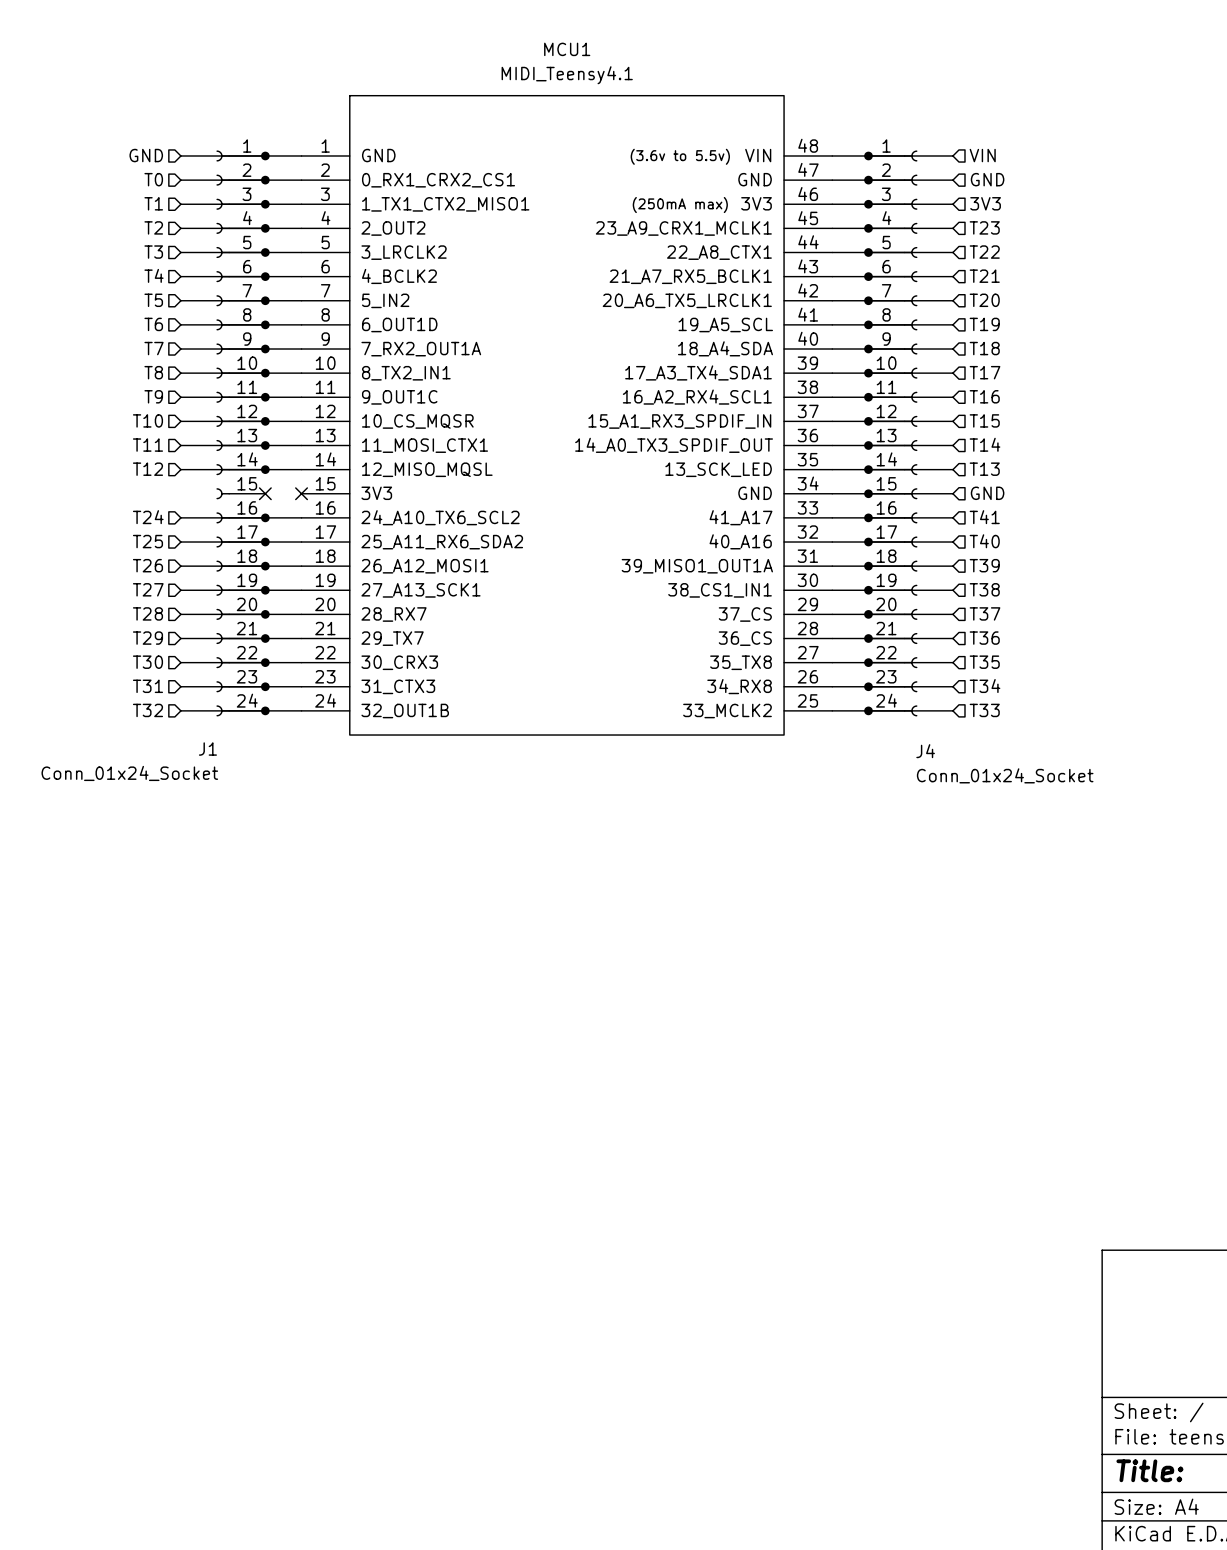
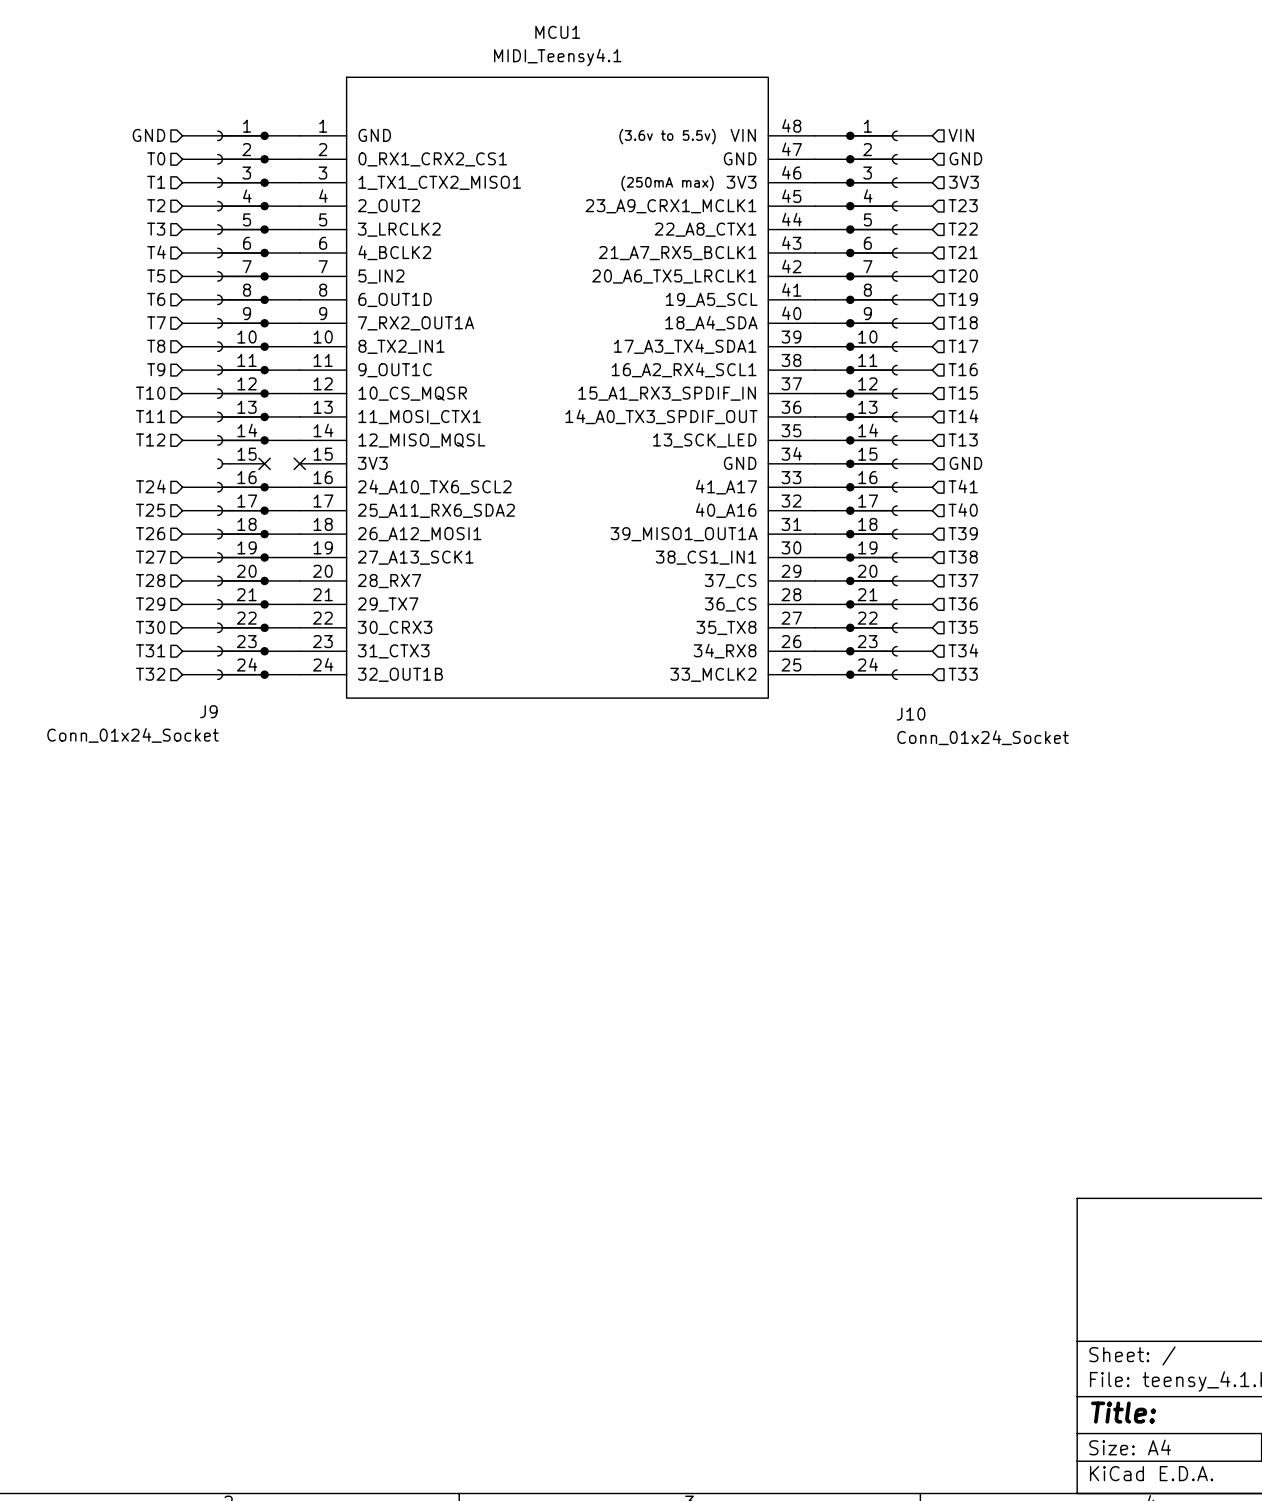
J1 name: J1 (207, 749) -> J9 (208, 711)
J4 name: J4 (925, 751) -> J10 (911, 714)

